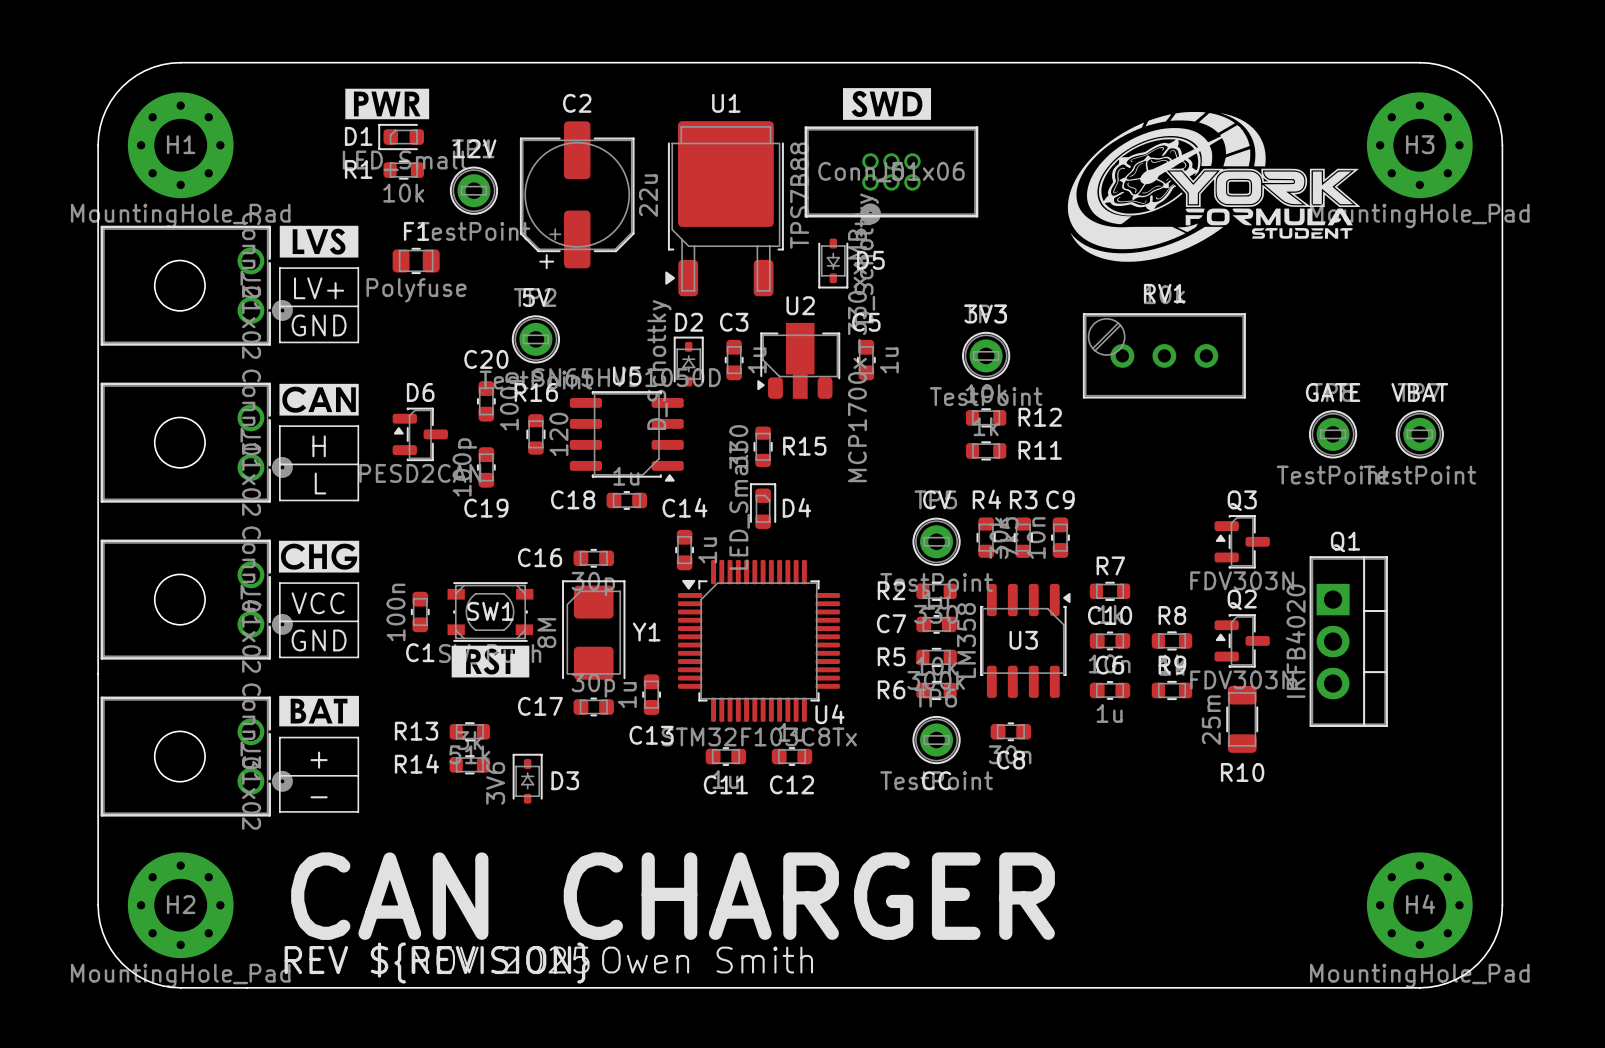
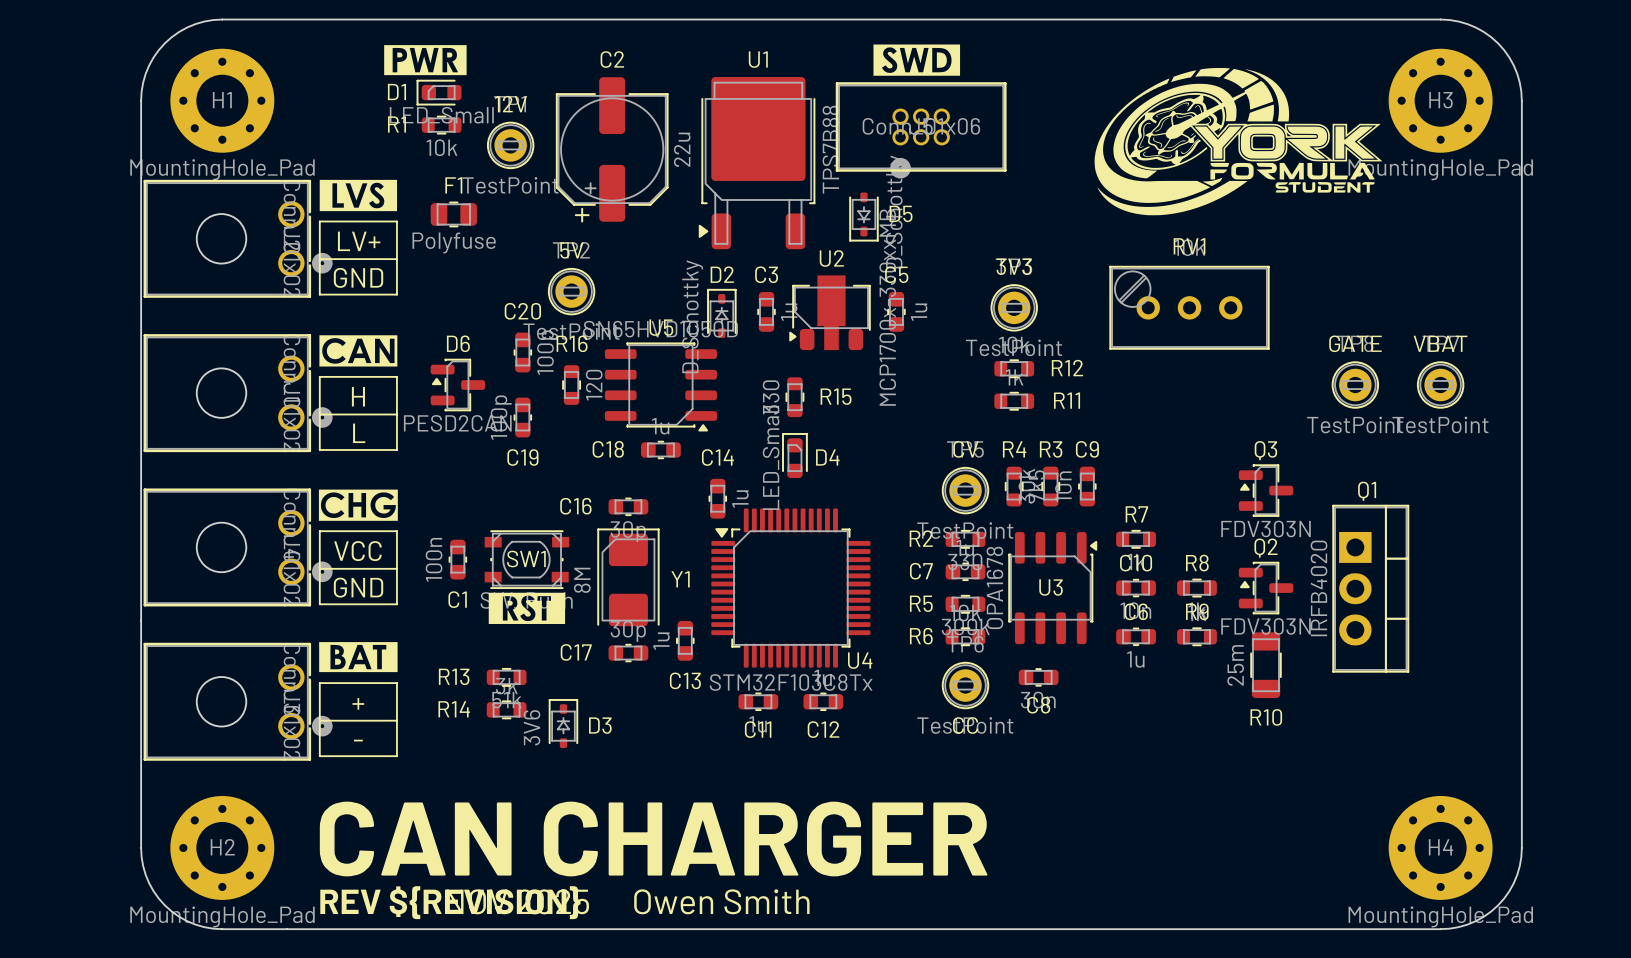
U3 value: LM358 (966, 640) -> OPA1678 (994, 587)

